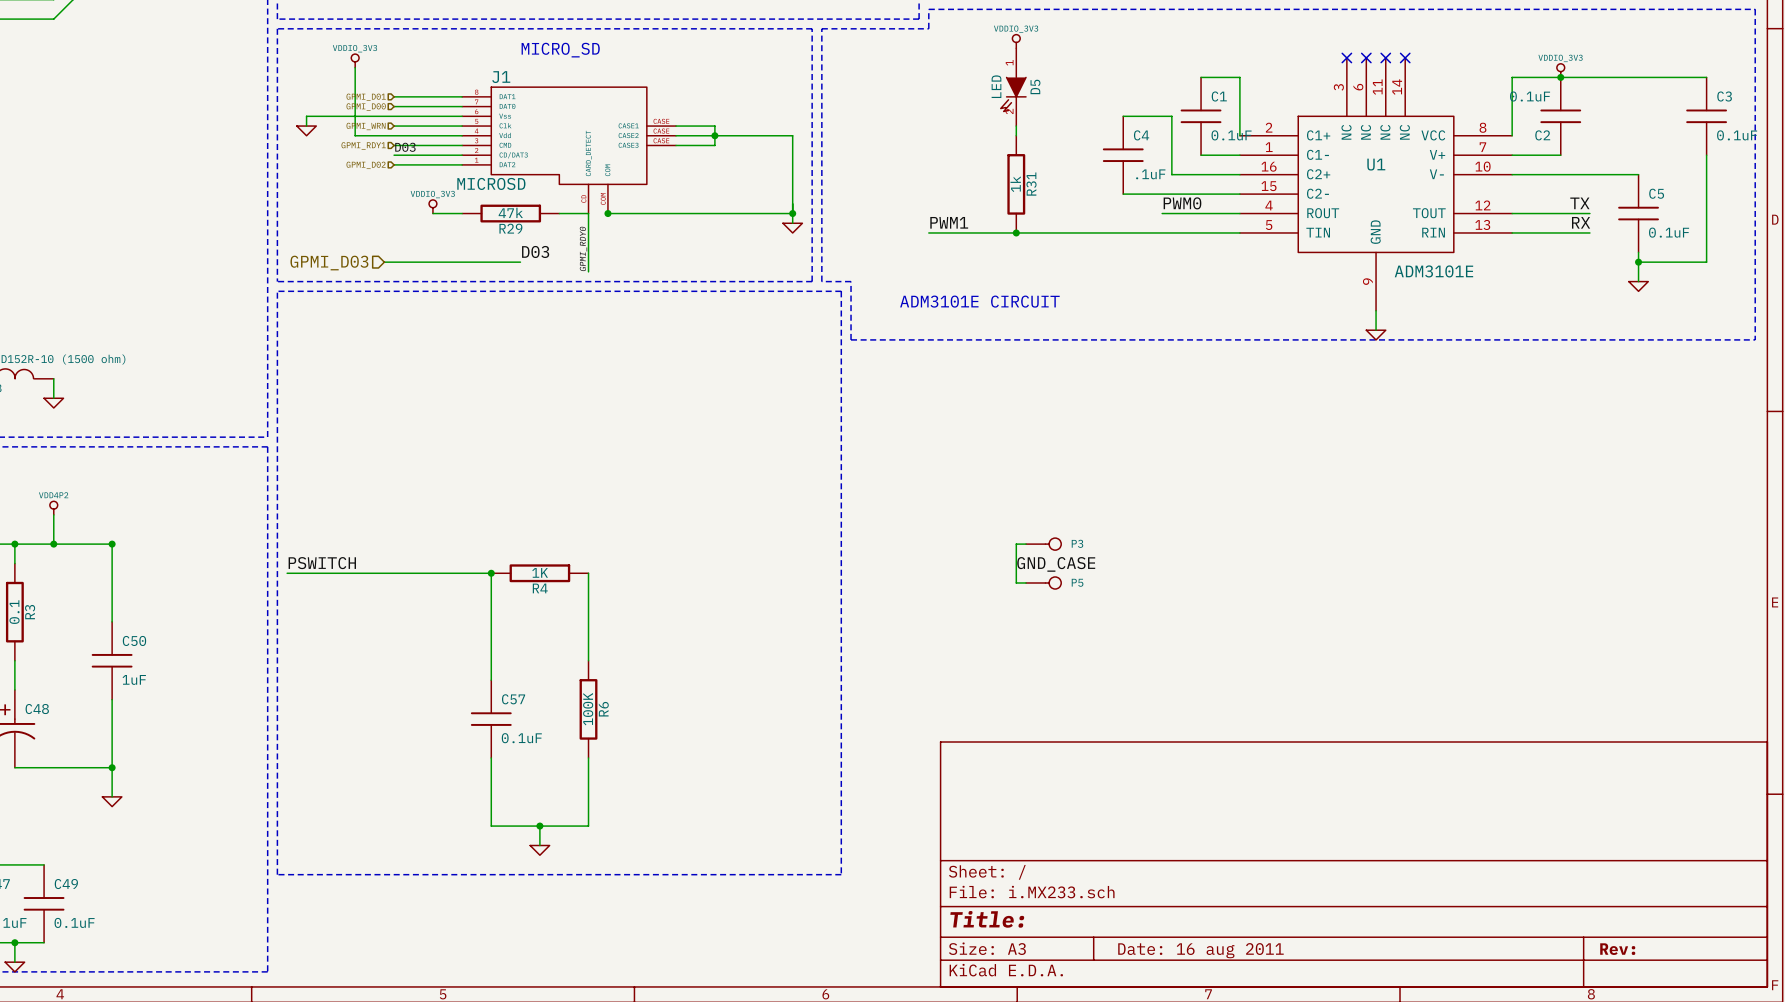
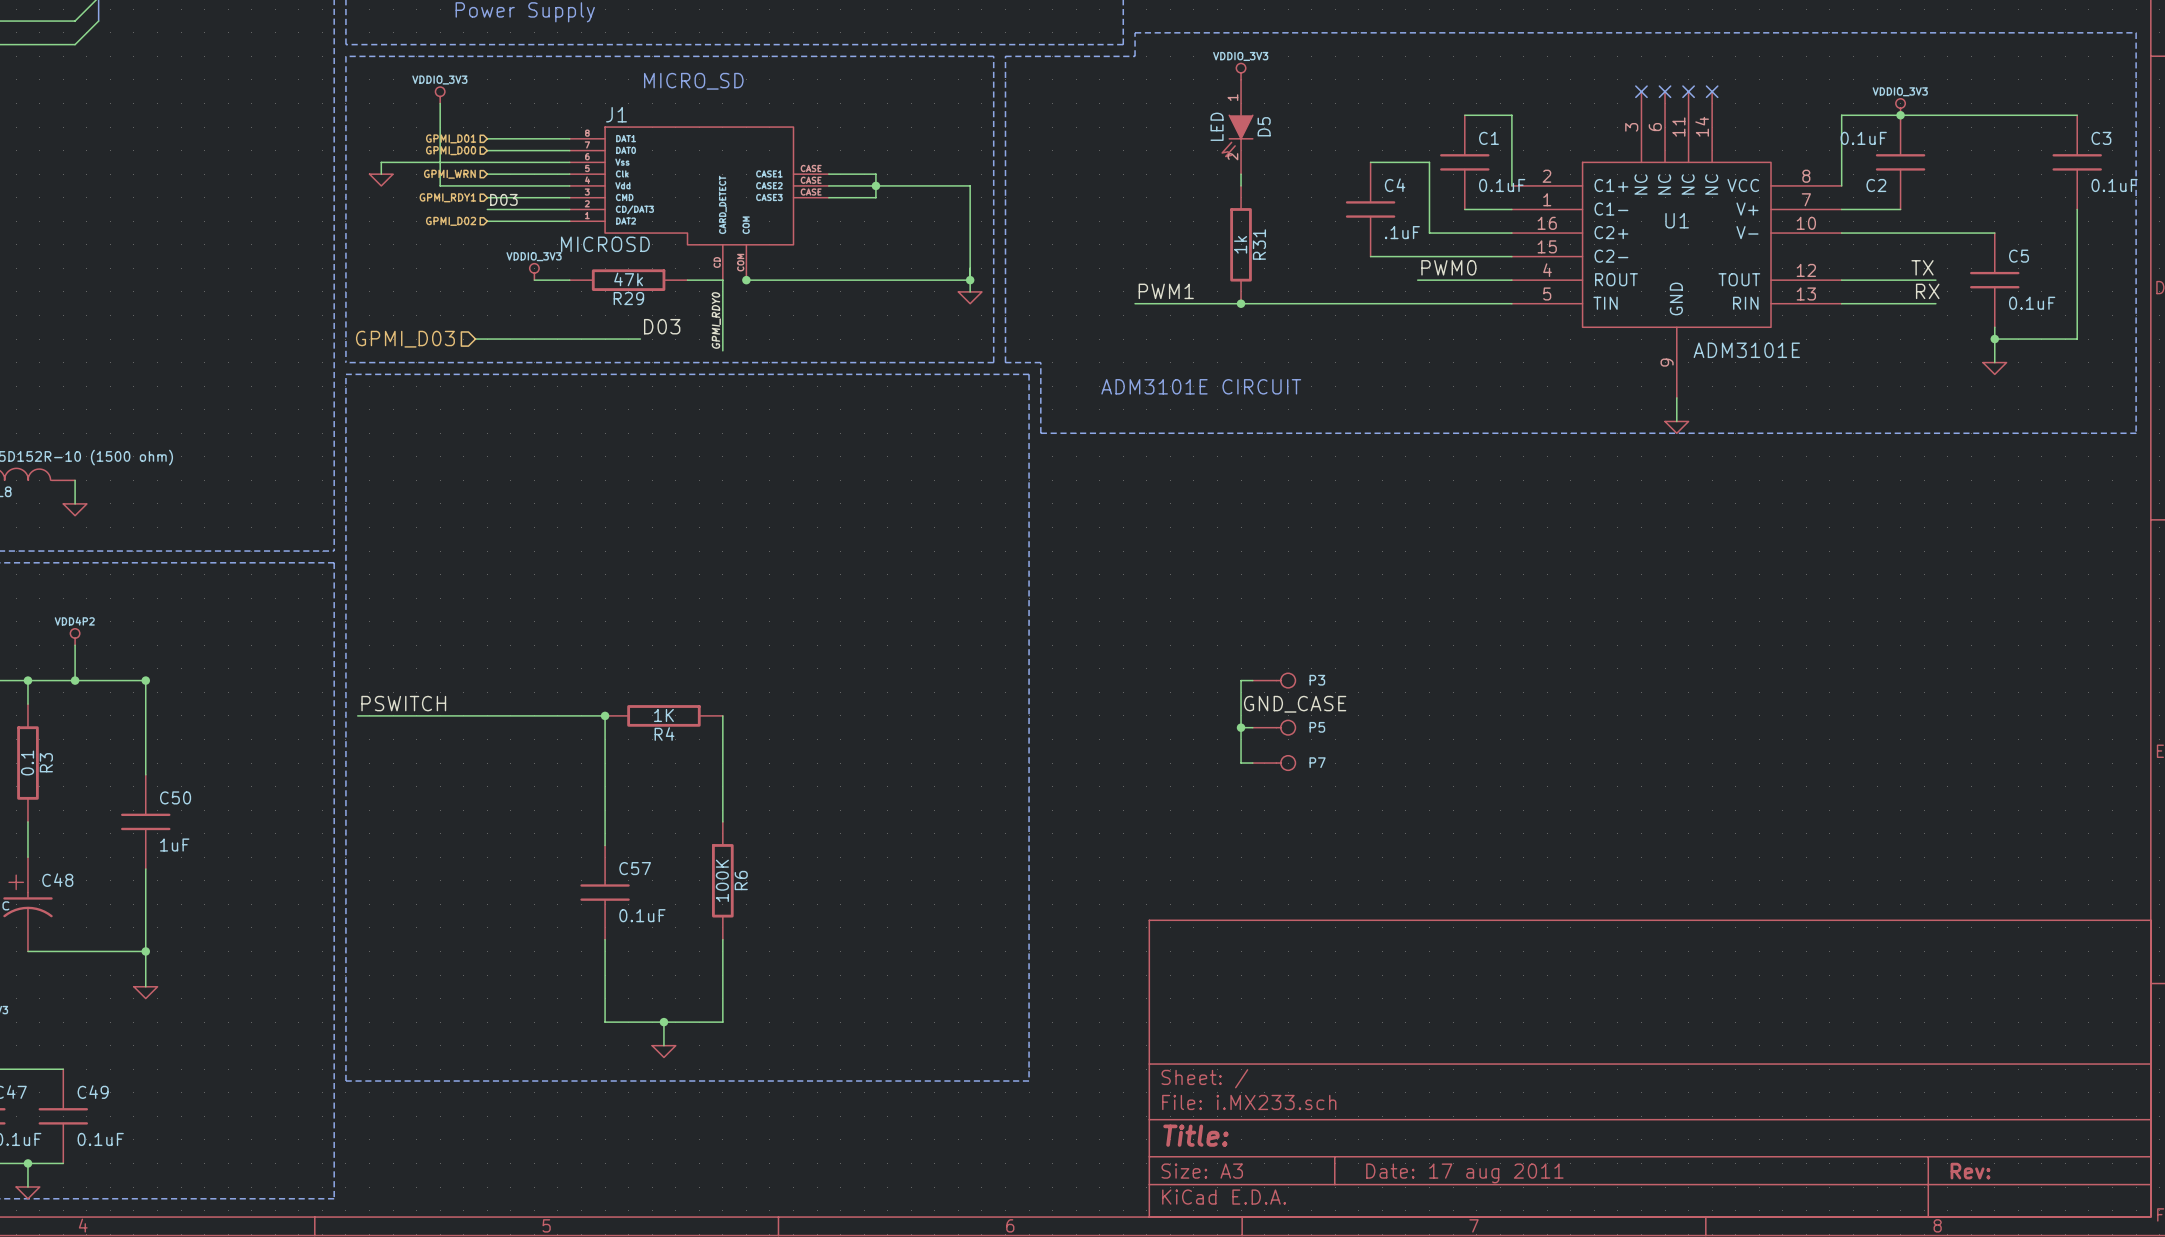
wire: none -> (1241, 727) (1241, 763) (1252, 763)
junction: none -> (1241, 727)
P7: none -> (1274, 763)
title block: Date: 16 aug 2011 (1200, 950) -> Date: 17 aug 2011 (1464, 1173)

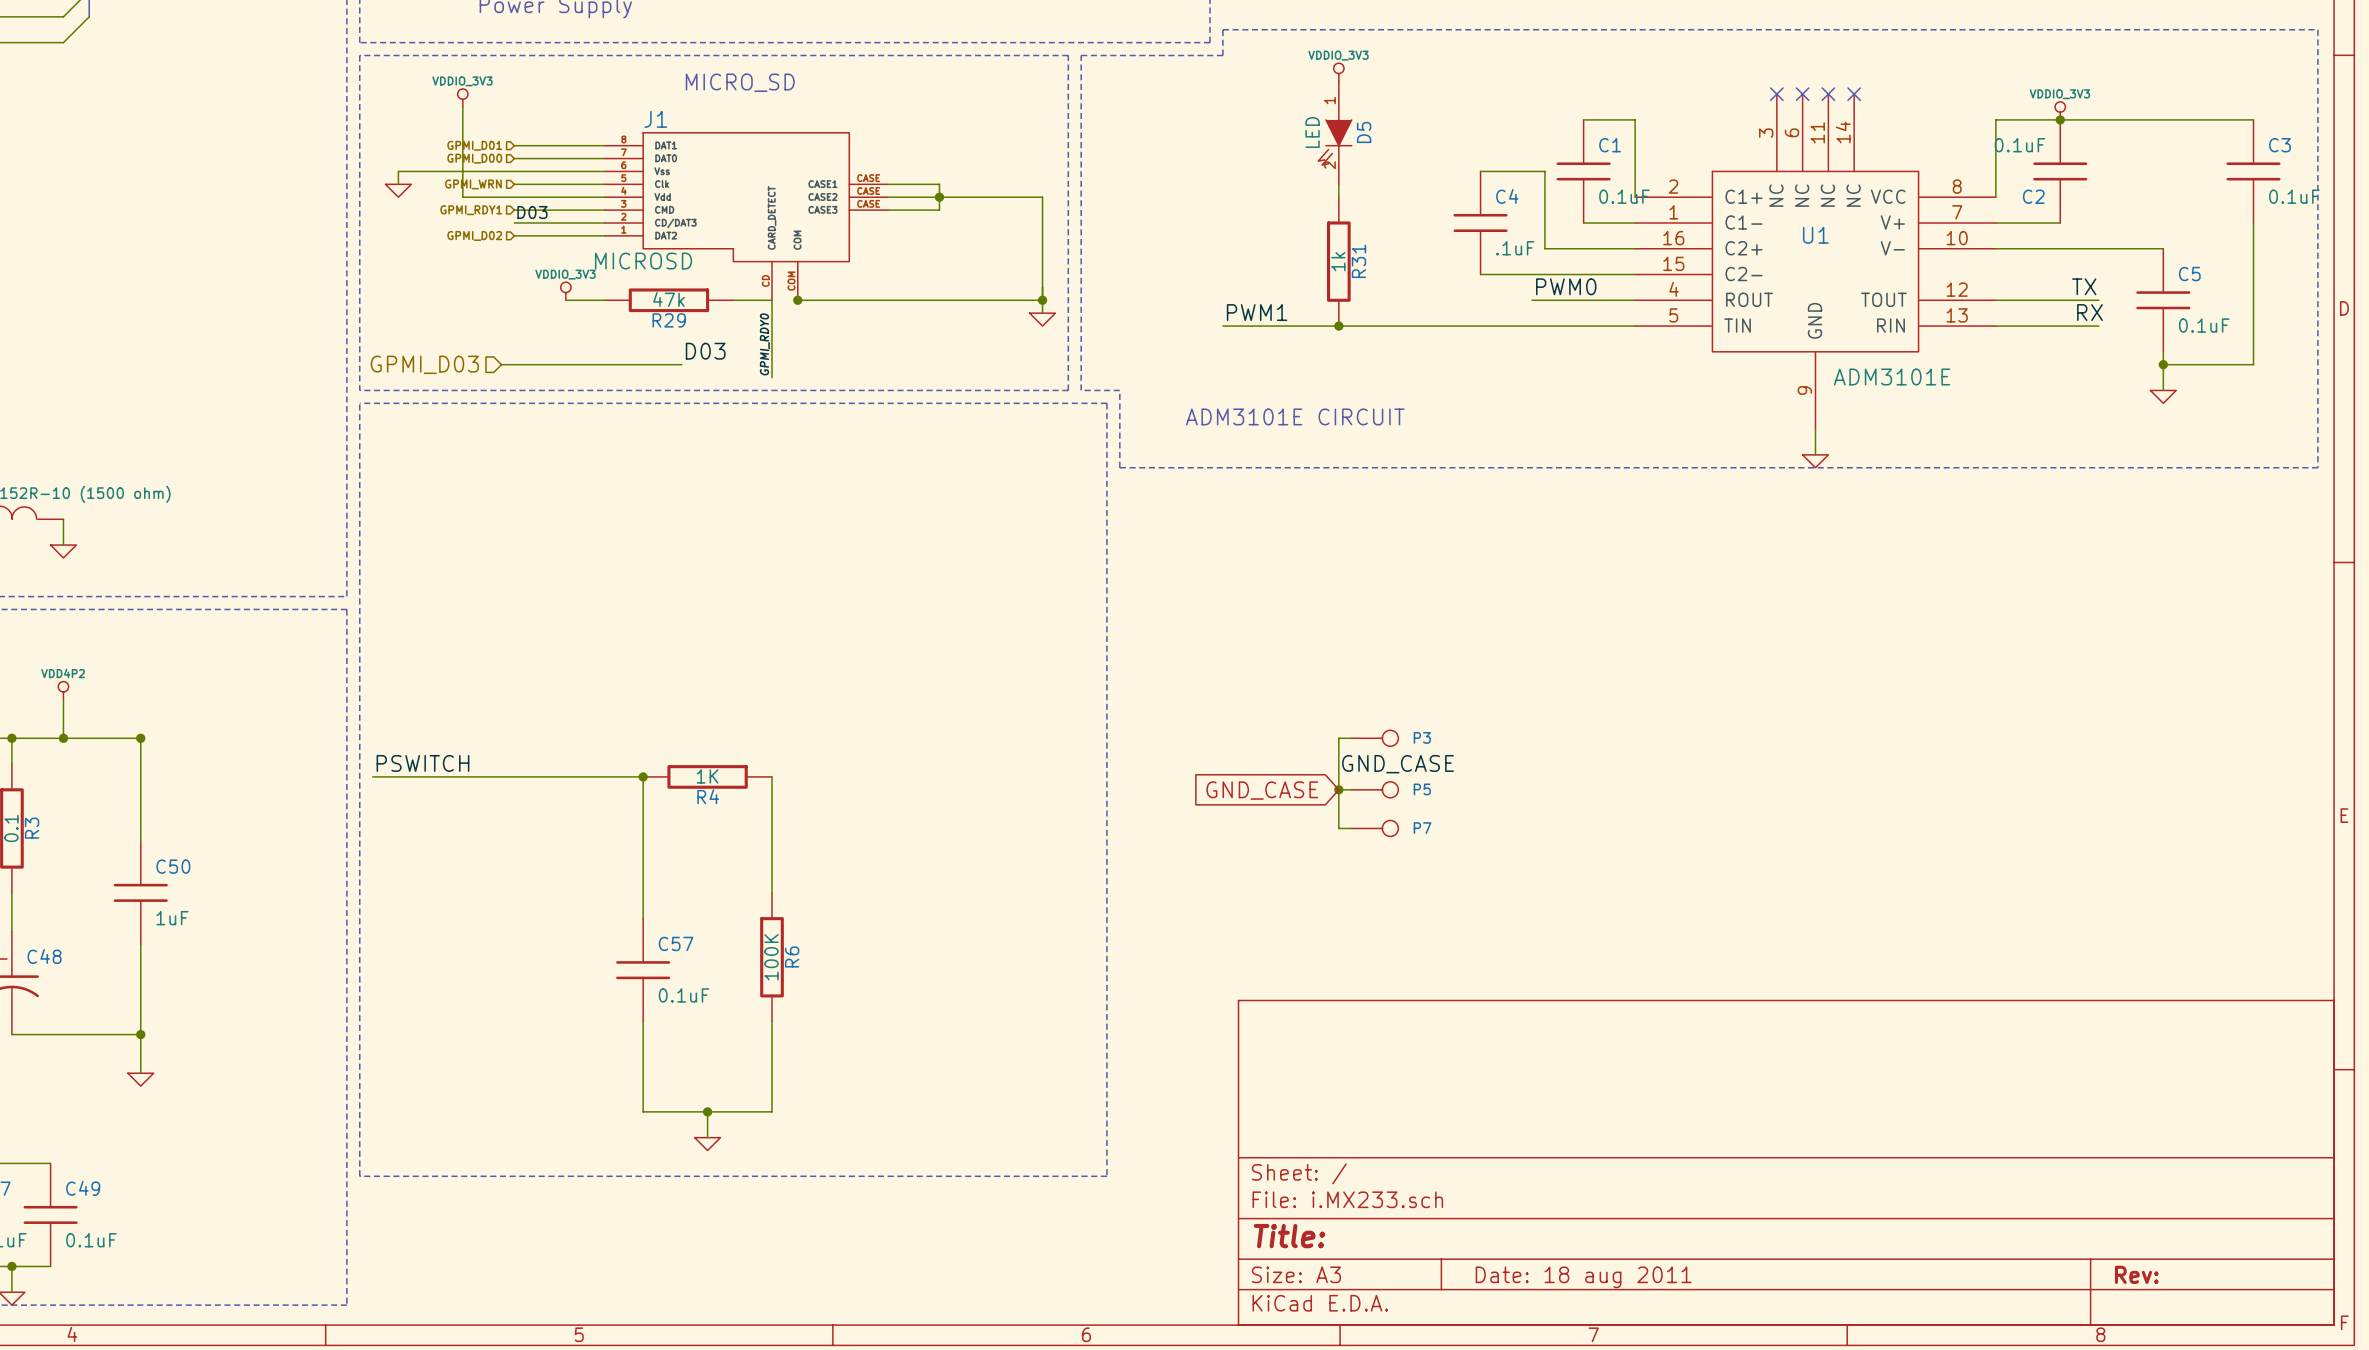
global label: none -> GND_CASE (1262, 790)
title block: Date: 17 aug 2011 (1464, 1173) -> Date: 18 aug 2011 (1583, 1277)

